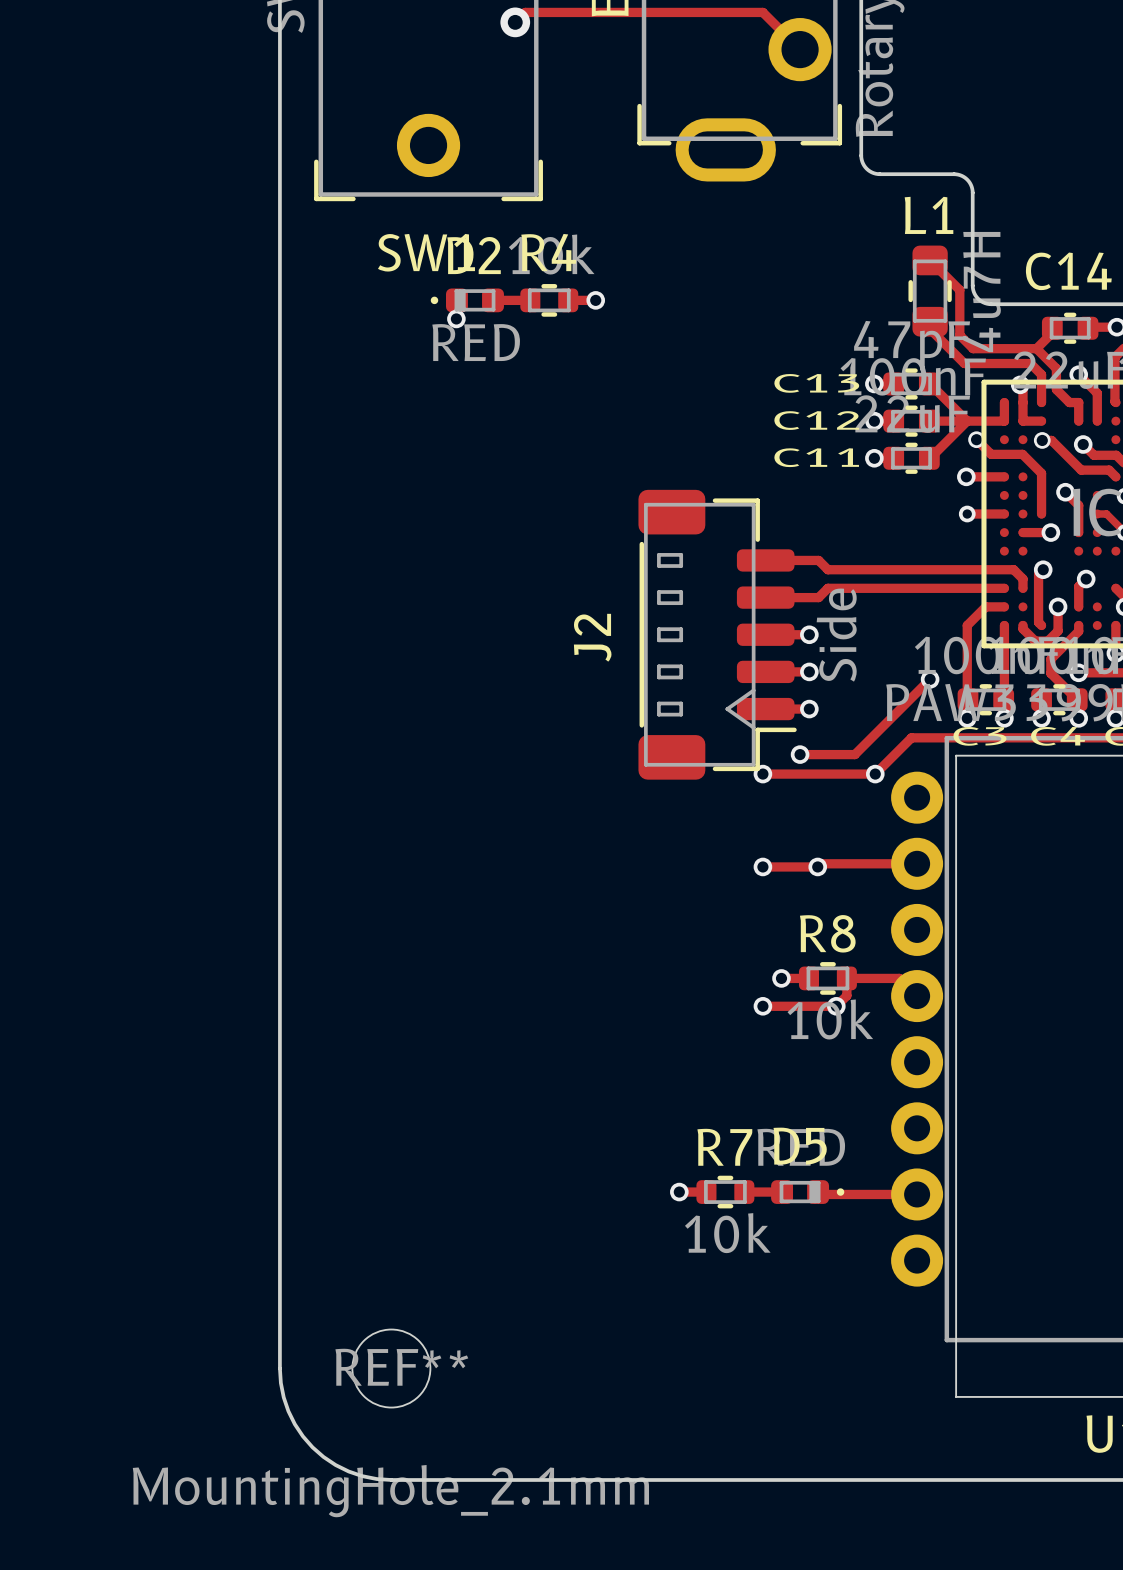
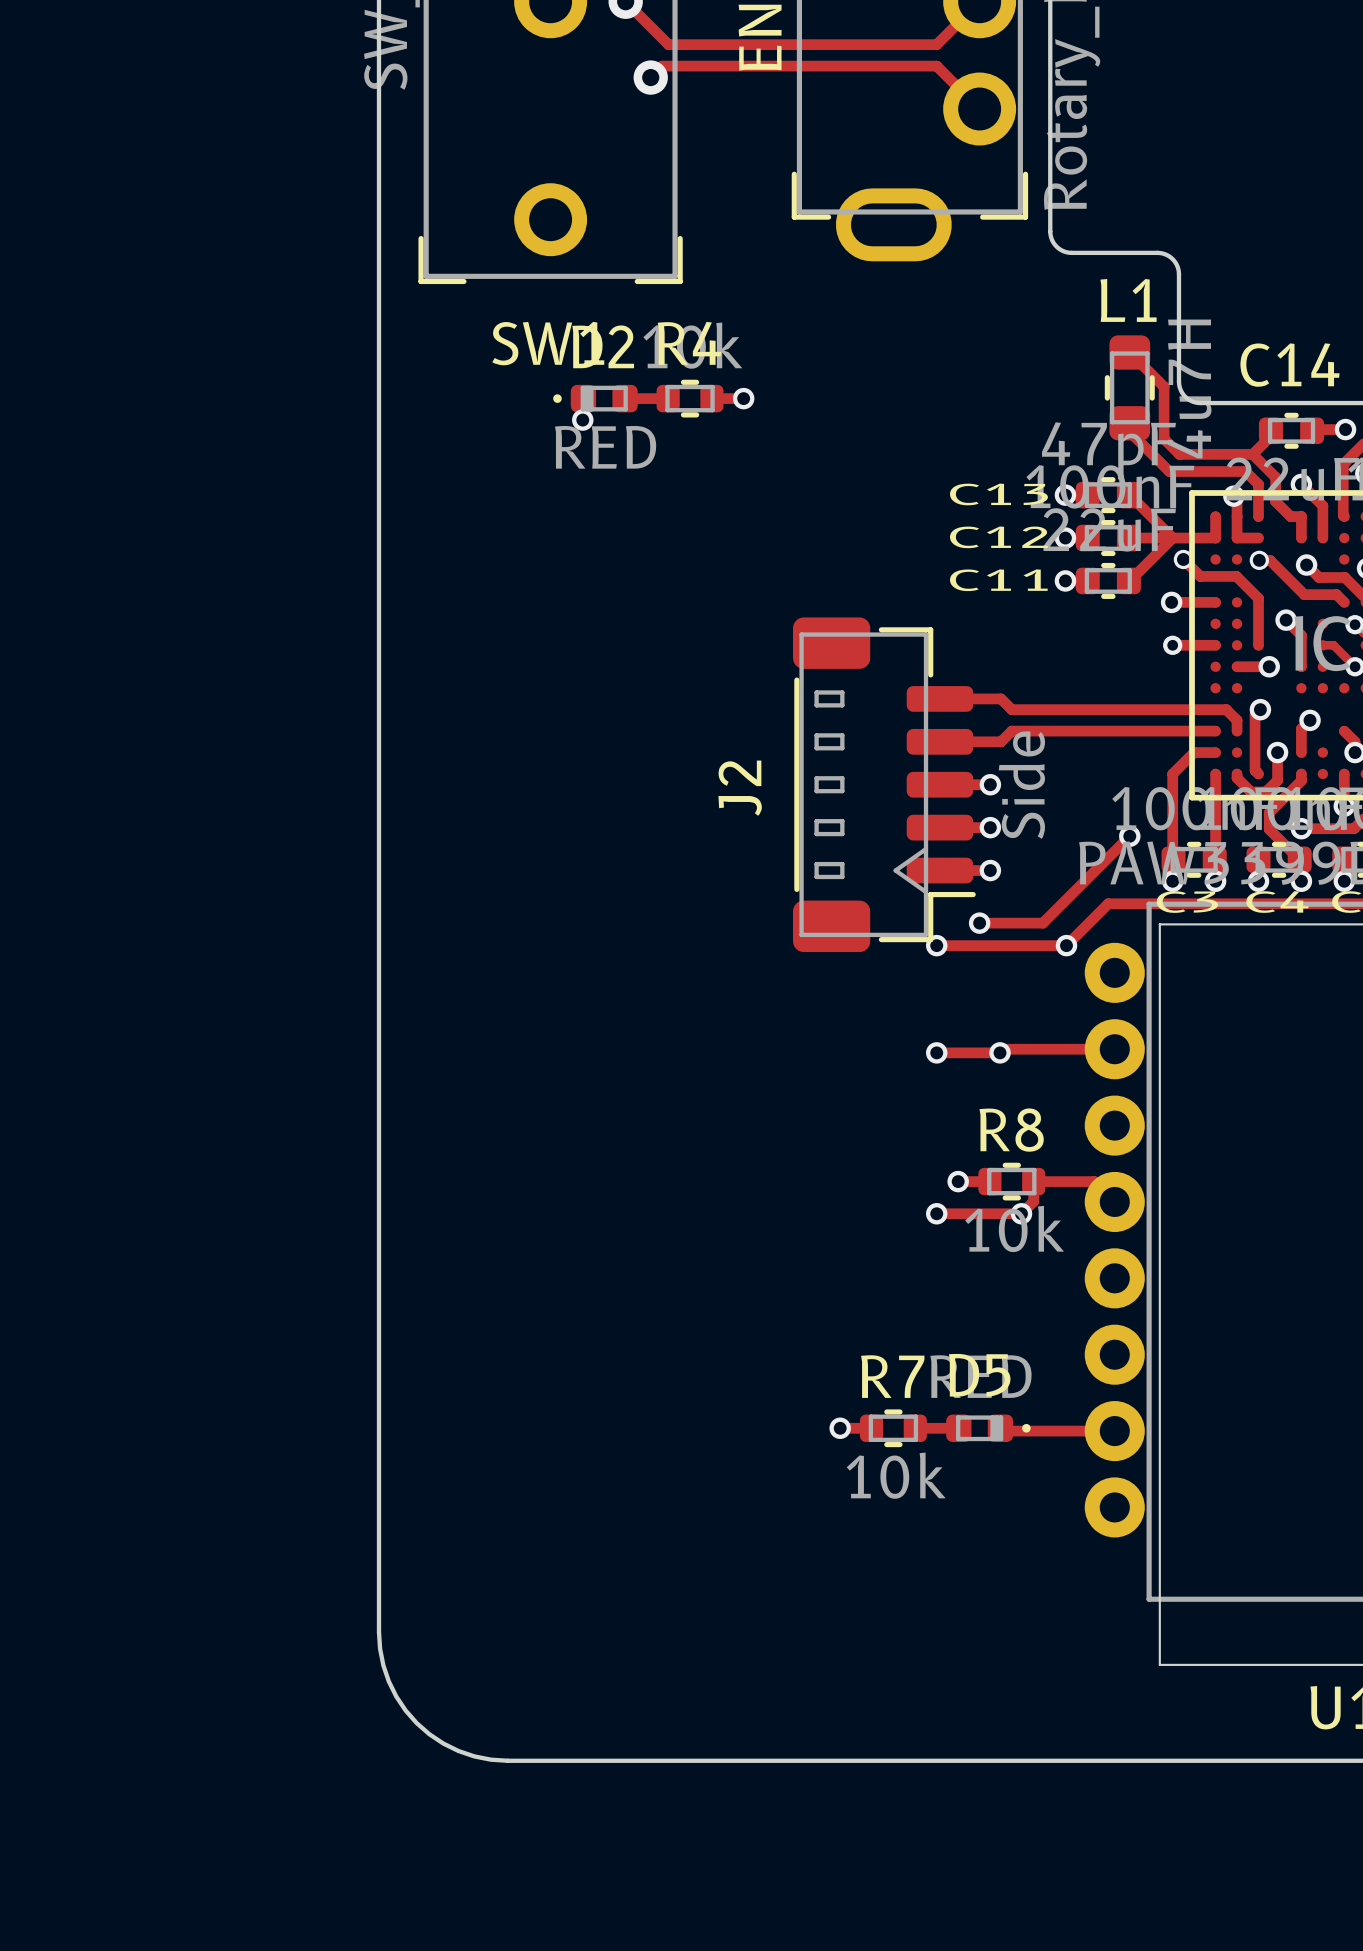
REF**: MountingHole_2.1mm (391, 1368) -> none

